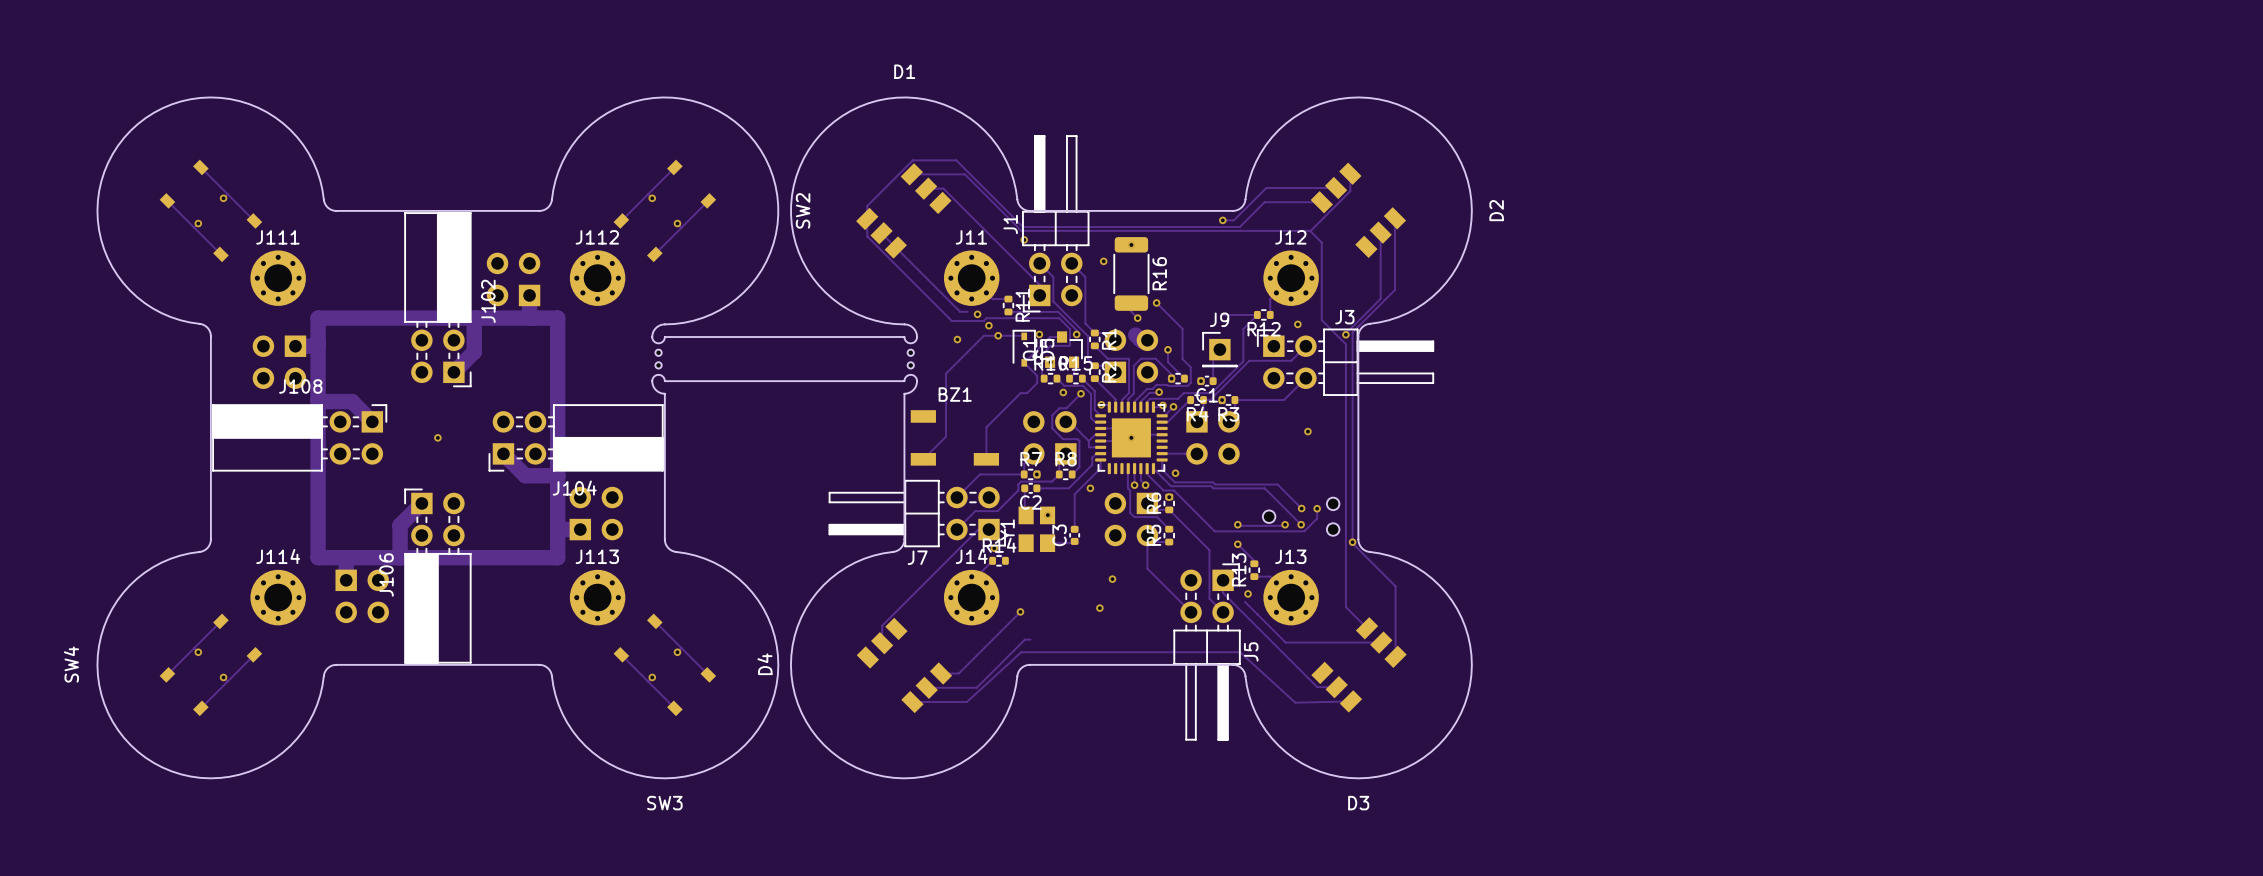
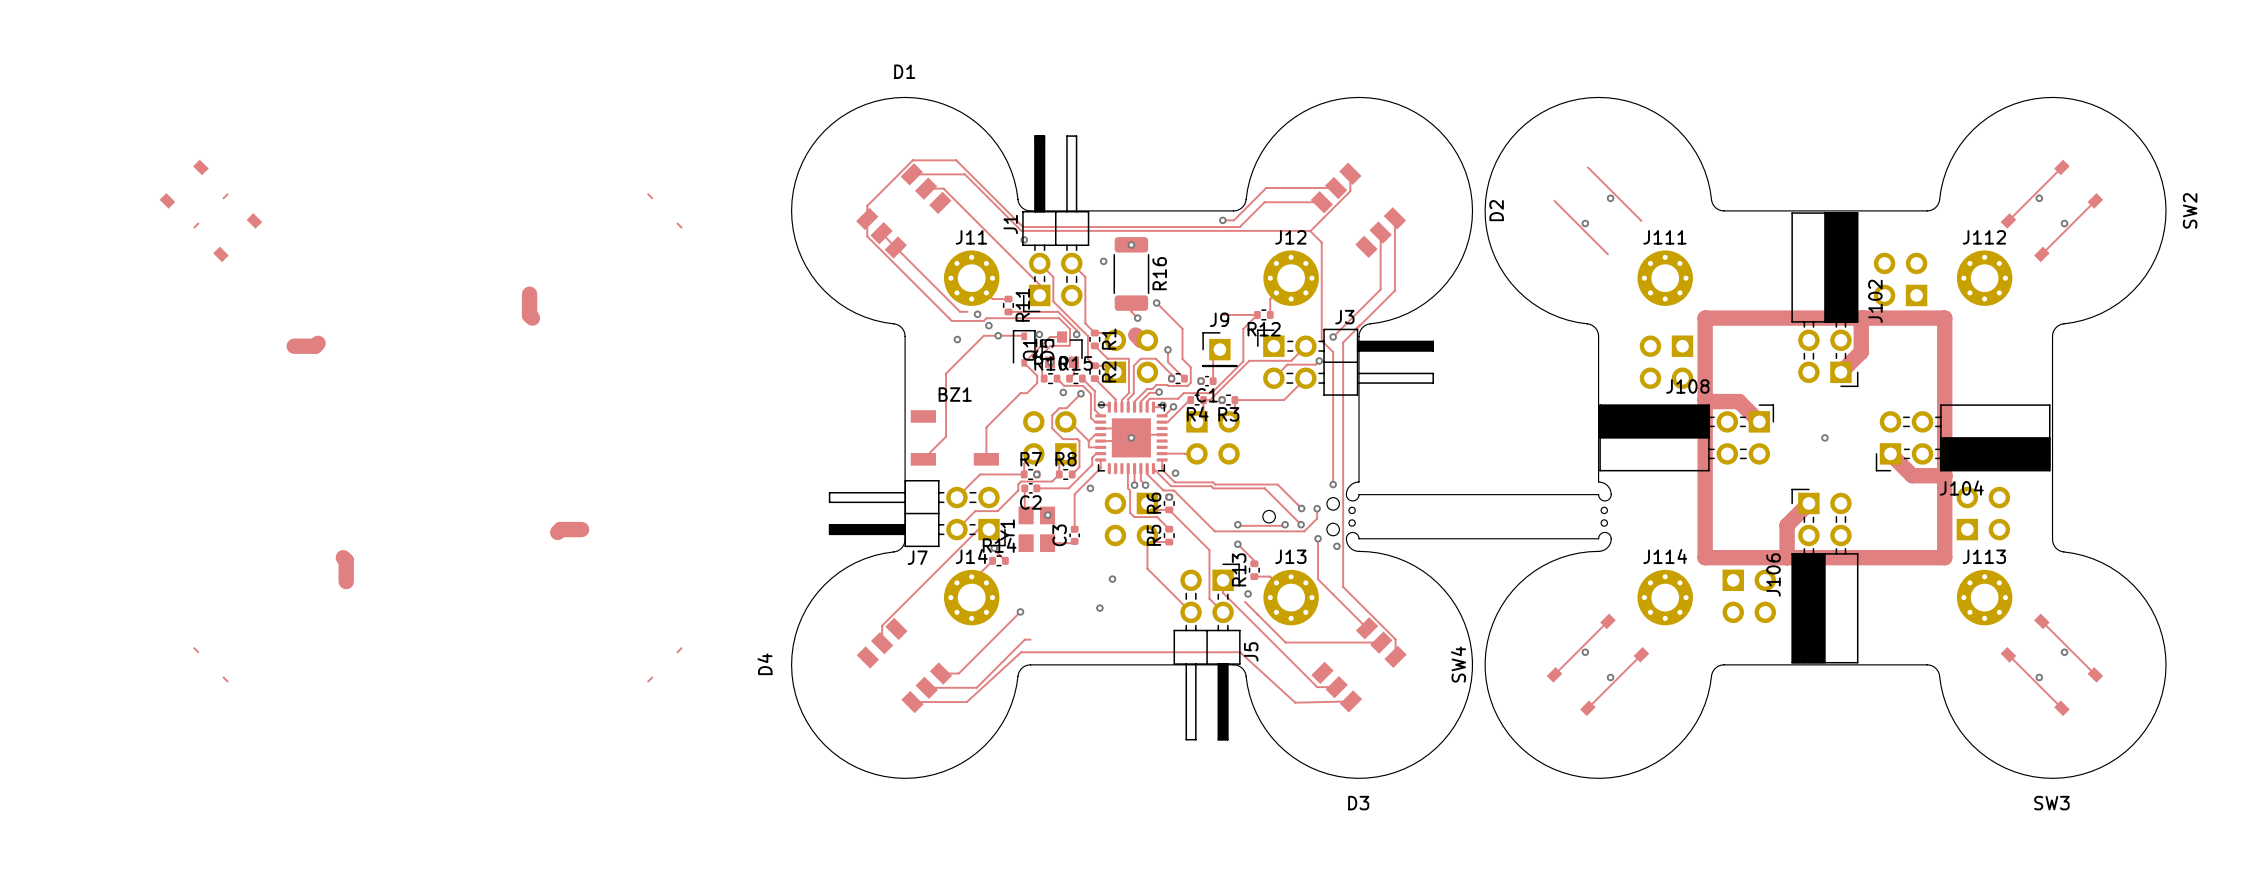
track: (200, 167) (254, 220) -> none
track: (674, 167) (621, 220) -> none
track: none -> (1587, 167) (1641, 220)
track: none -> (2061, 167) (2008, 220)
via: (223, 198) -> none
via: (652, 198) -> none
via: none -> (1610, 198)
via: none -> (2039, 198)
track: (167, 200) (220, 254) -> none
track: (708, 200) (654, 254) -> none
track: none -> (1554, 200) (1607, 254)
track: none -> (2095, 200) (2041, 254)
SW2 position: (664, 210) -> (2051, 210)
board edge: (1030, 210) (1023, 209) (1018, 203) (1010, 171) (997, 145) (984, 130) (970, 118) (944, 104) (925, 99) (896, 97) (868, 103) (850, 110) (827, 127) (814, 142) (803, 158) (796, 176) (792, 195) (791, 214) (793, 233) (798, 252) (807, 269) (818, 285) (832, 298) (848, 309) (866, 317) (910, 326) (916, 333) (915, 340) (909, 343) (904, 337) (664, 337) (663, 341) (658, 343) (654, 341) (652, 337) (653, 330) (658, 326) (702, 317) (728, 304) (743, 292) (756, 277) (766, 261) (773, 243) (777, 224) (778, 205) (775, 185) (765, 158) (755, 142) (742, 127) (726, 115) (709, 106) (691, 100) (672, 97) (643, 99) (624, 104) (599, 118) (584, 130) (566, 153) (555, 180) (551, 202) (542, 210) (336, 210) (329, 208) (325, 203) (320, 180) (308, 153) (297, 137) (283, 123) (266, 112) (239, 101) (210, 97) (190, 99) (171, 104) (154, 112) (137, 124) (124, 137) (112, 154) (104, 171) (99, 190) (97, 210) (99, 230) (107, 258) (117, 275) (129, 290) (144, 303) (161, 313) (180, 320) (203, 325) (210, 334) (210, 543) (202, 551) (180, 555) (161, 562) (144, 572) (129, 585) (117, 600) (107, 617) (101, 636) (97, 655) (97, 675) (101, 694) (112, 721) (130, 745) (145, 757) (162, 767) (181, 774) (210, 778) (239, 774) (266, 763) (283, 752) (303, 730) (317, 704) (325, 671) (329, 667) (336, 664) (543, 665) (551, 673) (555, 695) (562, 713) (578, 738) (592, 752) (608, 763) (636, 774) (665, 778) (694, 774) (721, 763) (737, 751) (757, 730) (771, 703) (777, 675) (776, 645) (771, 626) (763, 608) (752, 592) (738, 578) (713, 562) (695, 555) (673, 551) (665, 543) (664, 393) (657, 391) (653, 385) (652, 378) (657, 374) (663, 376) (664, 381) (904, 381) (906, 376) (910, 374) (916, 378) (914, 388) (904, 393) (902, 545) (896, 551) (873, 555) (855, 562) (830, 578) (816, 592) (805, 608) (794, 636) (791, 655) (791, 675) (797, 703) (811, 730) (831, 751) (847, 763) (865, 771) (894, 777) (923, 776) (951, 768) (976, 752) (996, 730) (1010, 704) (1018, 671) (1023, 666) (1030, 664) -> (1030, 210) (1024, 209) (1019, 204) (1011, 170) (1002, 153) (991, 137) (969, 117) (952, 107) (933, 101) (914, 97) (894, 97) (865, 104) (848, 112) (832, 124) (818, 137) (806, 154) (795, 181) (791, 210) (795, 239) (806, 266) (824, 290) (839, 303) (865, 317) (898, 325) (904, 333) (905, 539) (903, 545) (898, 550) (874, 555) (855, 562) (839, 572) (824, 585) (811, 600) (801, 617) (793, 645) (791, 665) (793, 684) (798, 703) (806, 721) (824, 745) (839, 757) (856, 767) (884, 776) (904, 778) (924, 776) (943, 771) (969, 758) (984, 745) (997, 730) (1007, 713) (1014, 695) (1019, 671) (1023, 667) (1030, 664)
board edge: (1232, 210) (1240, 208) (1244, 203) (1249, 180) (1256, 161) (1266, 144) (1278, 129) (1294, 117) (1311, 107) (1339, 99) (1358, 97) (1378, 99) (1397, 104) (1415, 112) (1438, 130) (1456, 154) (1464, 171) (1470, 190) (1471, 210) (1470, 230) (1461, 258) (1451, 275) (1439, 290) (1424, 303) (1407, 313) (1389, 320) (1365, 325) (1360, 329) (1358, 336) (1358, 542) (1365, 550) (1398, 558) (1424, 572) (1445, 592) (1457, 608) (1468, 636) (1471, 665) (1467, 694) (1456, 721) (1445, 737) (1431, 751) (1415, 763) (1397, 771) (1368, 777) (1349, 777) (1329, 774) (1302, 763) (1286, 752) (1272, 738) (1260, 722) (1252, 704) (1244, 671) (1240, 667) (1232, 664) -> (1232, 210) (1239, 209) (1244, 204) (1252, 170) (1266, 144) (1286, 123) (1311, 107) (1339, 99) (1359, 97) (1379, 99) (1407, 108) (1432, 124) (1445, 137) (1457, 154) (1468, 181) (1472, 210) (1468, 239) (1462, 258) (1452, 275) (1432, 297) (1408, 313) (1389, 320) (1367, 324) (1360, 330) (1359, 482) (1349, 486) (1346, 497) (1352, 500) (1357, 499) (1359, 494) (1598, 494) (1601, 499) (1605, 500) (1610, 497) (1610, 489) (1606, 484) (1598, 482) (1597, 331) (1590, 324) (1567, 320) (1549, 313) (1524, 297) (1511, 283) (1499, 266) (1491, 249) (1486, 230) (1485, 200) (1492, 171) (1505, 145) (1525, 124) (1541, 112) (1568, 101) (1598, 97) (1627, 101) (1654, 112) (1670, 123) (1684, 137) (1700, 161) (1707, 180) (1712, 202) (1719, 210) (1927, 210) (1934, 208) (1938, 204) (1946, 170) (1960, 144) (1980, 123) (1996, 112) (2023, 101) (2053, 97) (2072, 99) (2100, 108) (2125, 124) (2139, 137) (2150, 154) (2159, 171) (2164, 190) (2165, 220) (2162, 239) (2155, 258) (2146, 275) (2133, 290) (2118, 303) (2101, 313) (2083, 320) (2060, 324) (2053, 331) (2052, 540) (2059, 550) (2083, 555) (2101, 562) (2118, 572) (2133, 585) (2146, 600) (2155, 617) (2162, 636) (2166, 665) (2164, 684) (2159, 703) (2150, 721) (2139, 737) (2125, 751) (2109, 763) (2091, 771) (2072, 776) (2053, 778) (2023, 774) (1996, 763) (1980, 752) (1966, 738) (1954, 722) (1943, 695) (1938, 671) (1934, 667) (1927, 664) (1720, 665) (1712, 673) (1707, 695) (1696, 721) (1685, 737) (1664, 757) (1638, 771) (1619, 776) (1600, 778) (1571, 775) (1553, 769) (1536, 759) (1521, 747) (1508, 733) (1497, 717) (1490, 699) (1486, 680) (1485, 651) (1489, 632) (1496, 614) (1506, 597) (1519, 583) (1542, 565) (1560, 557) (1604, 549) (1609, 545) (1611, 538) (1609, 534) (1604, 532) (1600, 534) (1598, 538) (1359, 538) (1354, 532) (1347, 534) (1346, 542) (1352, 549) (1397, 557) (1414, 565) (1430, 576) (1444, 590) (1456, 605) (1464, 623) (1470, 641) (1472, 661) (1471, 680) (1467, 699) (1459, 717) (1449, 733) (1436, 747) (1421, 759) (1395, 772) (1366, 778) (1337, 776) (1310, 767) (1293, 757) (1278, 744) (1266, 730) (1252, 704) (1244, 671) (1239, 666) (1232, 664)
via: (198, 223) -> none
via: (677, 223) -> none
via: none -> (1585, 223)
via: none -> (2064, 223)
J111 position: (278, 278) -> (1665, 278)
J112 position: (597, 278) -> (1984, 278)
part: (513, 279) -> none
part: none -> (1900, 279)
track: (1380, 289) (1380, 298) (1345, 334) -> (1380, 289) (1333, 337)
track: (1394, 289) (1352, 332) (1352, 543) (1395, 586) (1395, 639) -> (1394, 289) (1343, 342) (1343, 586) (1395, 639)
J102 position: (437, 299) -> (1824, 299)
track: (318, 318) (318, 557) (557, 557) (557, 318) (318, 318) -> none
track: (475, 318) (474, 351) (453, 372) -> none
track: none -> (1705, 318) (1705, 557) (1944, 557) (1944, 318) (1705, 318)
track: none -> (1862, 318) (1861, 351) (1840, 372)
track: (1321, 320) (1345, 344) (1345, 607) -> (1321, 320) (1321, 340) (1333, 352) (1333, 484)
via: (1297, 324) -> none
via position: (1345, 334) -> (1333, 337)
part: (658, 359) -> none
part: (910, 359) -> none
track: none -> (1319, 360) (1315, 364) (1287, 364) (1273, 378)
via: none -> (1319, 360)
part: (279, 362) -> none
part: none -> (1666, 362)
track: (318, 400) (351, 401) (372, 421) -> none
track: none -> (1705, 400) (1739, 401) (1759, 421)
via: (1307, 431) -> none
J108 position: (299, 437) -> (1686, 437)
via: (437, 437) -> none
J104 position: (576, 437) -> (1963, 437)
via: none -> (1824, 437)
track: (503, 453) (525, 475) (557, 475) -> none
track: none -> (1890, 453) (1912, 475) (1944, 475)
via: none -> (1333, 484)
track: (421, 503) (400, 525) (400, 557) -> none
track: none -> (1808, 503) (1787, 525) (1787, 557)
part: (596, 513) -> none
part: none -> (1983, 513)
part: none -> (1352, 516)
part: none -> (1604, 516)
track: none -> (1318, 538) (1318, 579) (1345, 607)
via: none -> (1318, 538)
via position: (1352, 542) -> (1336, 546)
J106 position: (437, 576) -> (1824, 576)
part: (362, 596) -> none
part: none -> (1749, 596)
J114 position: (278, 597) -> (1665, 597)
J113 position: (597, 597) -> (1984, 597)
track: (220, 621) (167, 674) -> none
track: (654, 621) (708, 674) -> none
track: none -> (1607, 621) (1554, 674)
track: none -> (2041, 621) (2095, 674)
via: (198, 652) -> none
via: (677, 652) -> none
via: none -> (1585, 652)
via: none -> (2064, 652)
track: (254, 654) (200, 708) -> none
track: (621, 654) (674, 708) -> none
track: none -> (1641, 654) (1587, 708)
track: none -> (2008, 654) (2061, 708)
SW4 position: (210, 664) -> (1597, 664)
SW3 position: (664, 664) -> (2051, 664)
via: (223, 677) -> none
via: (652, 677) -> none
via: none -> (1610, 677)
via: none -> (2039, 677)

